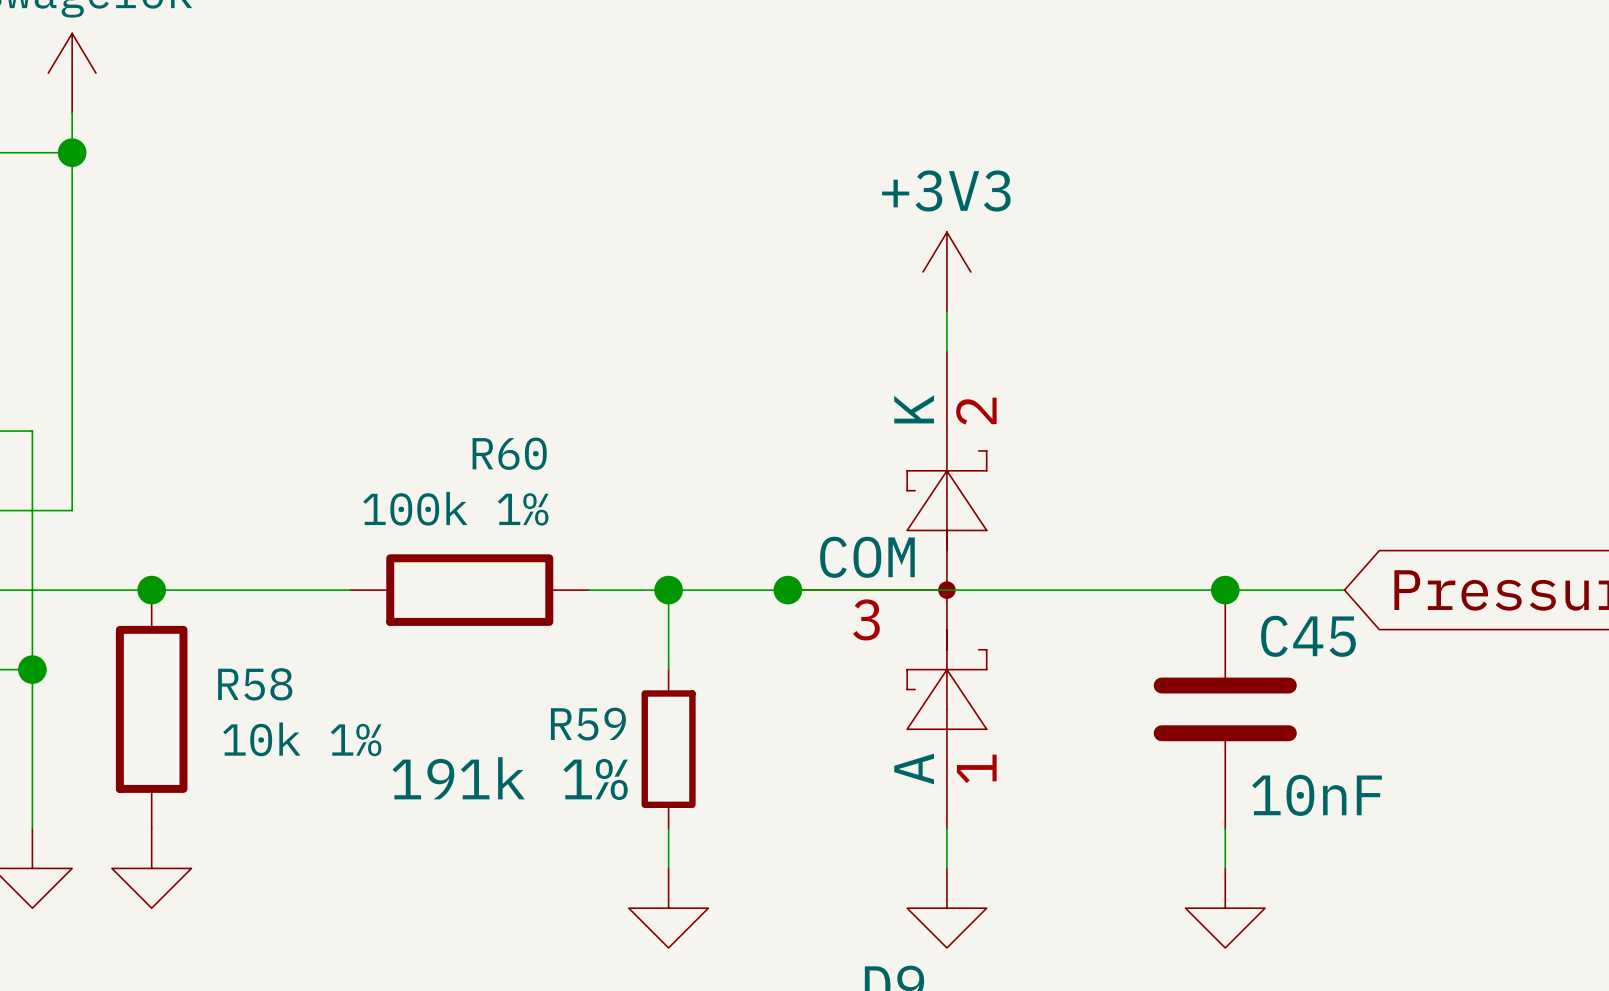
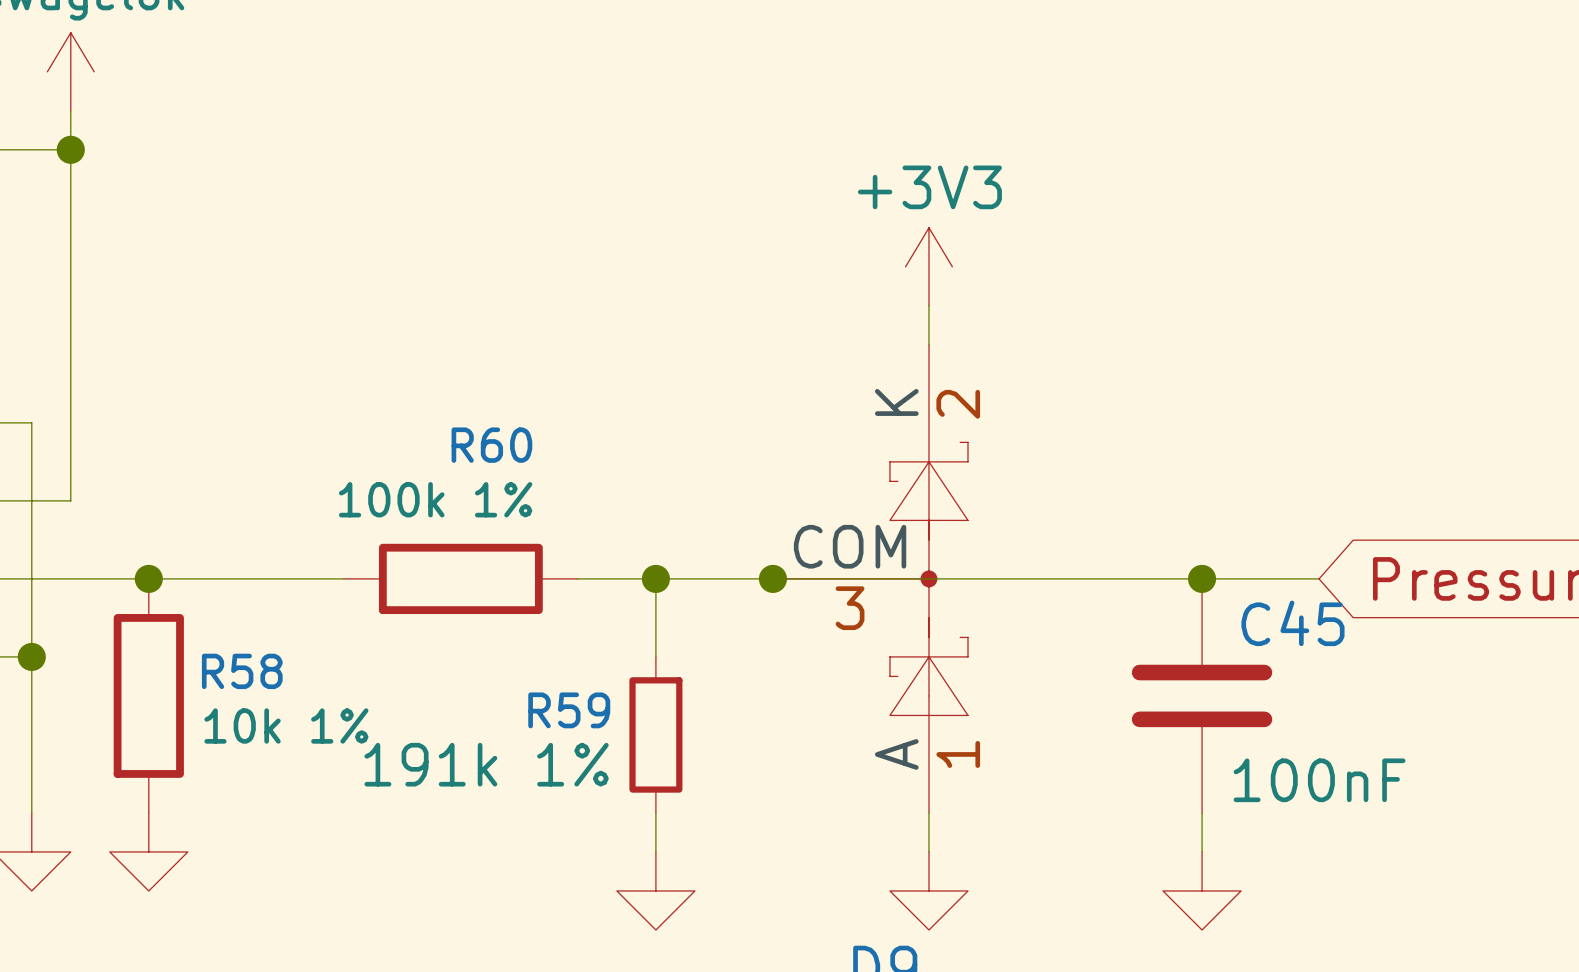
C45 value: 10nF (1317, 795) -> 100nF (1319, 780)

